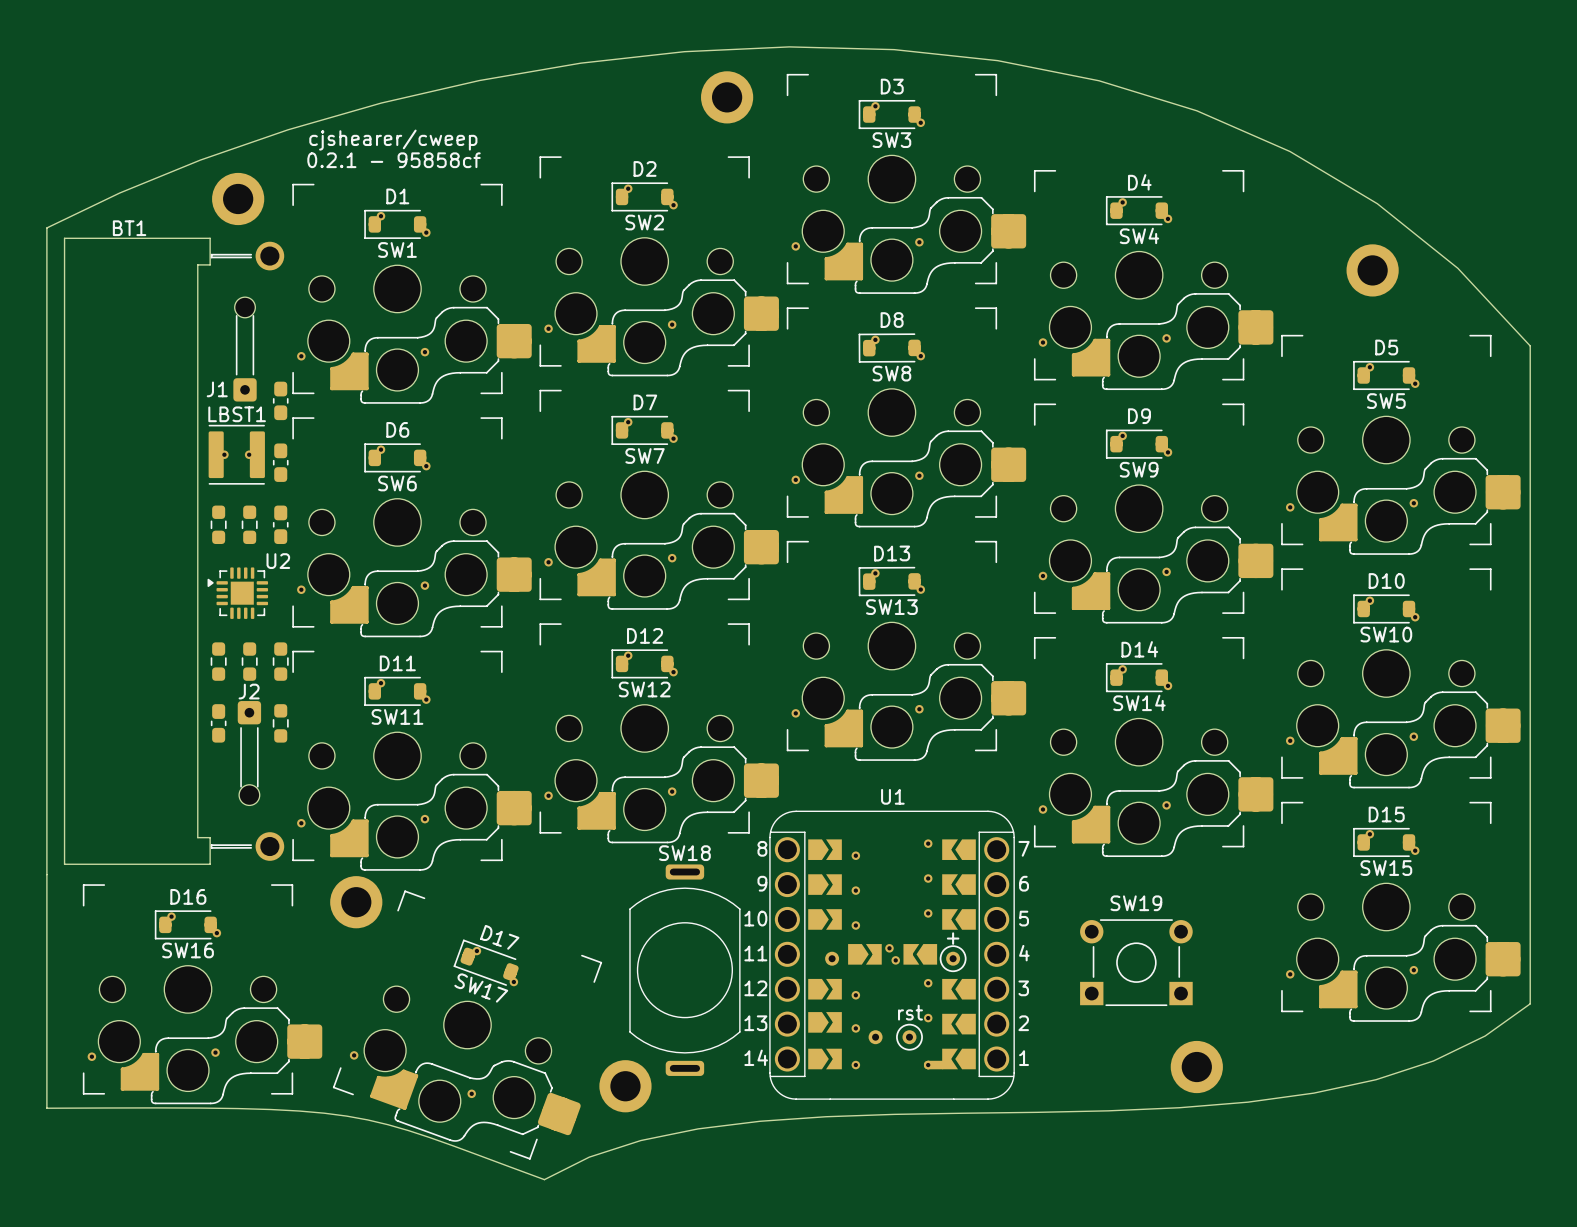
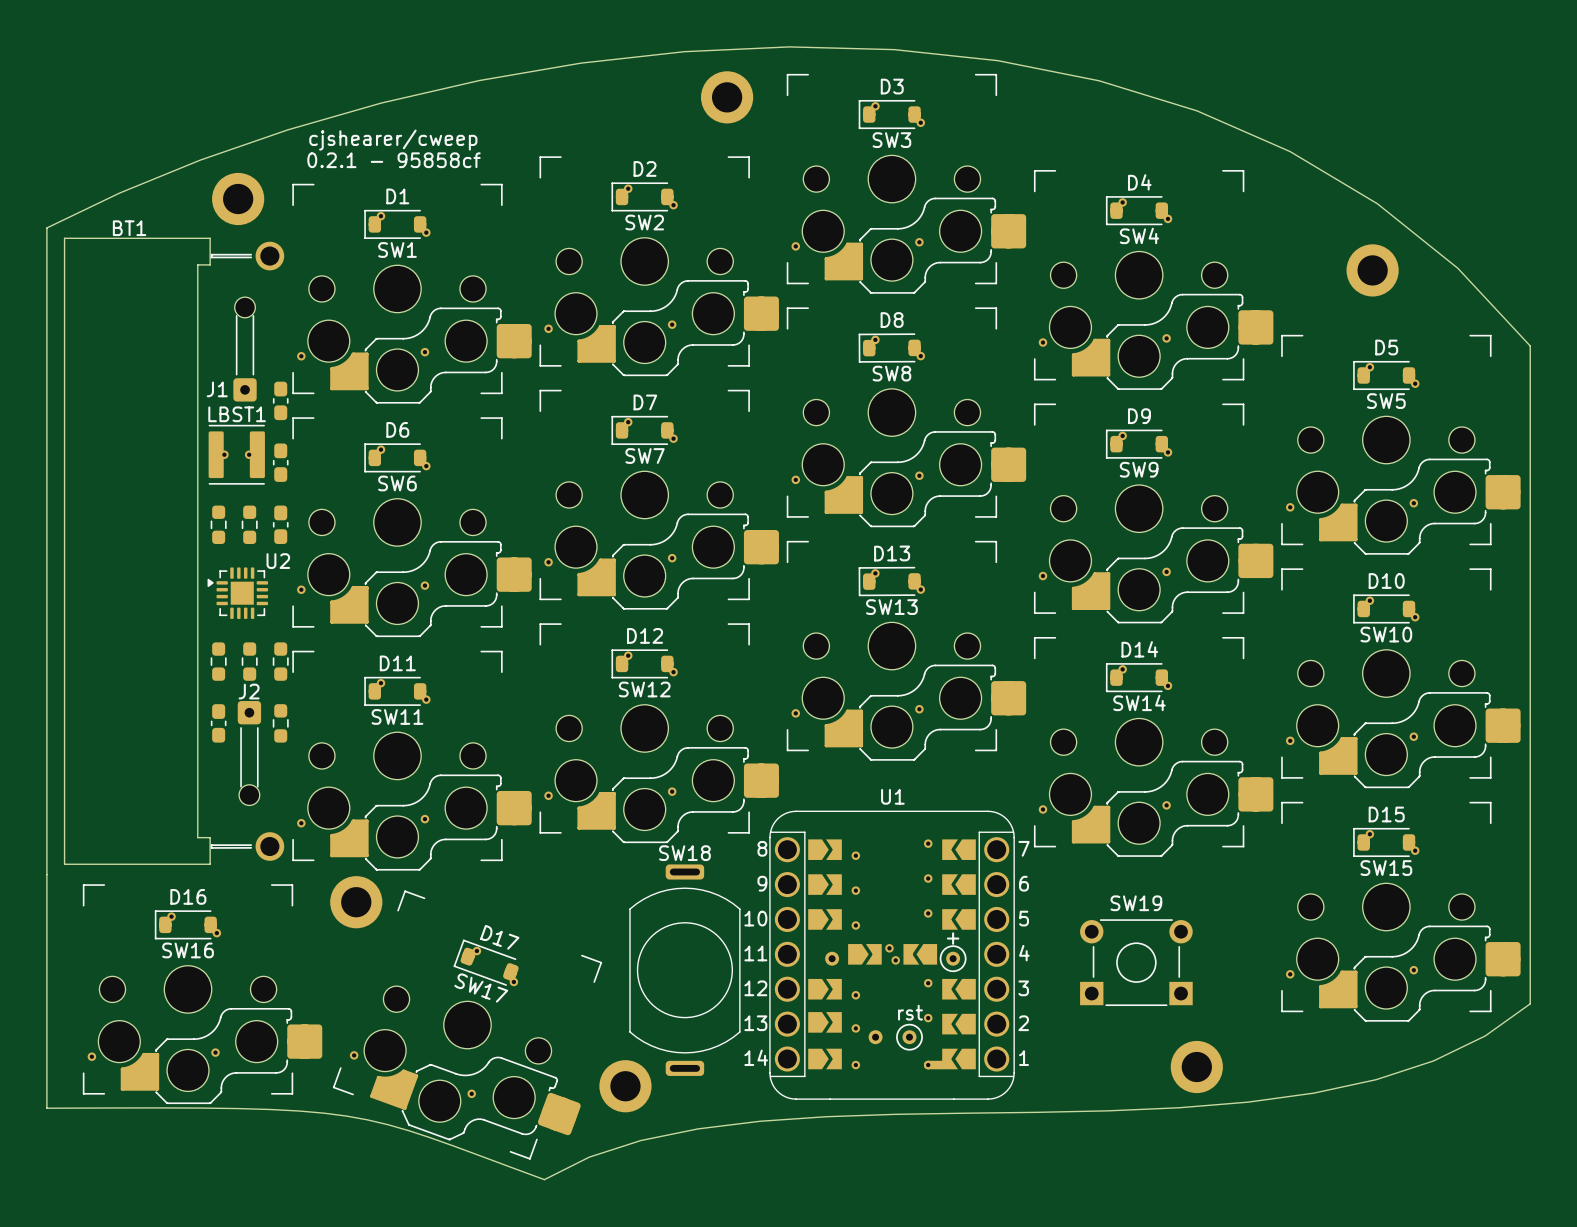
SW3 footprint: [786, 73, 1027, 294] -> [786, 73, 1027, 294]
SW2 footprint: [539, 156, 779, 377] -> [539, 156, 779, 377]
SW4 footprint: [1033, 170, 1274, 391] -> [1033, 170, 1274, 390]
SW1 footprint: [292, 183, 532, 404] -> [292, 183, 532, 404]
SW8 footprint: [786, 307, 1027, 528] -> [786, 307, 1027, 528]
SW5 footprint: [1281, 334, 1521, 555] -> [1281, 334, 1521, 555]
SW7 footprint: [539, 389, 779, 610] -> [539, 389, 779, 610]
SW9 footprint: [1033, 403, 1274, 624] -> [1033, 403, 1274, 624]
SW6 footprint: [292, 417, 532, 638] -> [292, 417, 532, 638]
SW13 footprint: [786, 540, 1027, 761] -> [786, 540, 1027, 761]
SW10 footprint: [1281, 568, 1521, 789] -> [1281, 568, 1521, 789]
SW12 footprint: [539, 623, 779, 844] -> [539, 623, 779, 844]
SW14 footprint: [1033, 636, 1274, 858] -> [1033, 636, 1274, 857]
SW11 footprint: [292, 650, 532, 871] -> [292, 650, 532, 871]
SW15 footprint: [1281, 801, 1521, 1022] -> [1281, 801, 1521, 1022]
SW16 footprint: [82, 884, 323, 1105] -> [82, 884, 323, 1105]
SW17 footprint: [332, 890, 603, 1160] -> [332, 890, 603, 1160]

